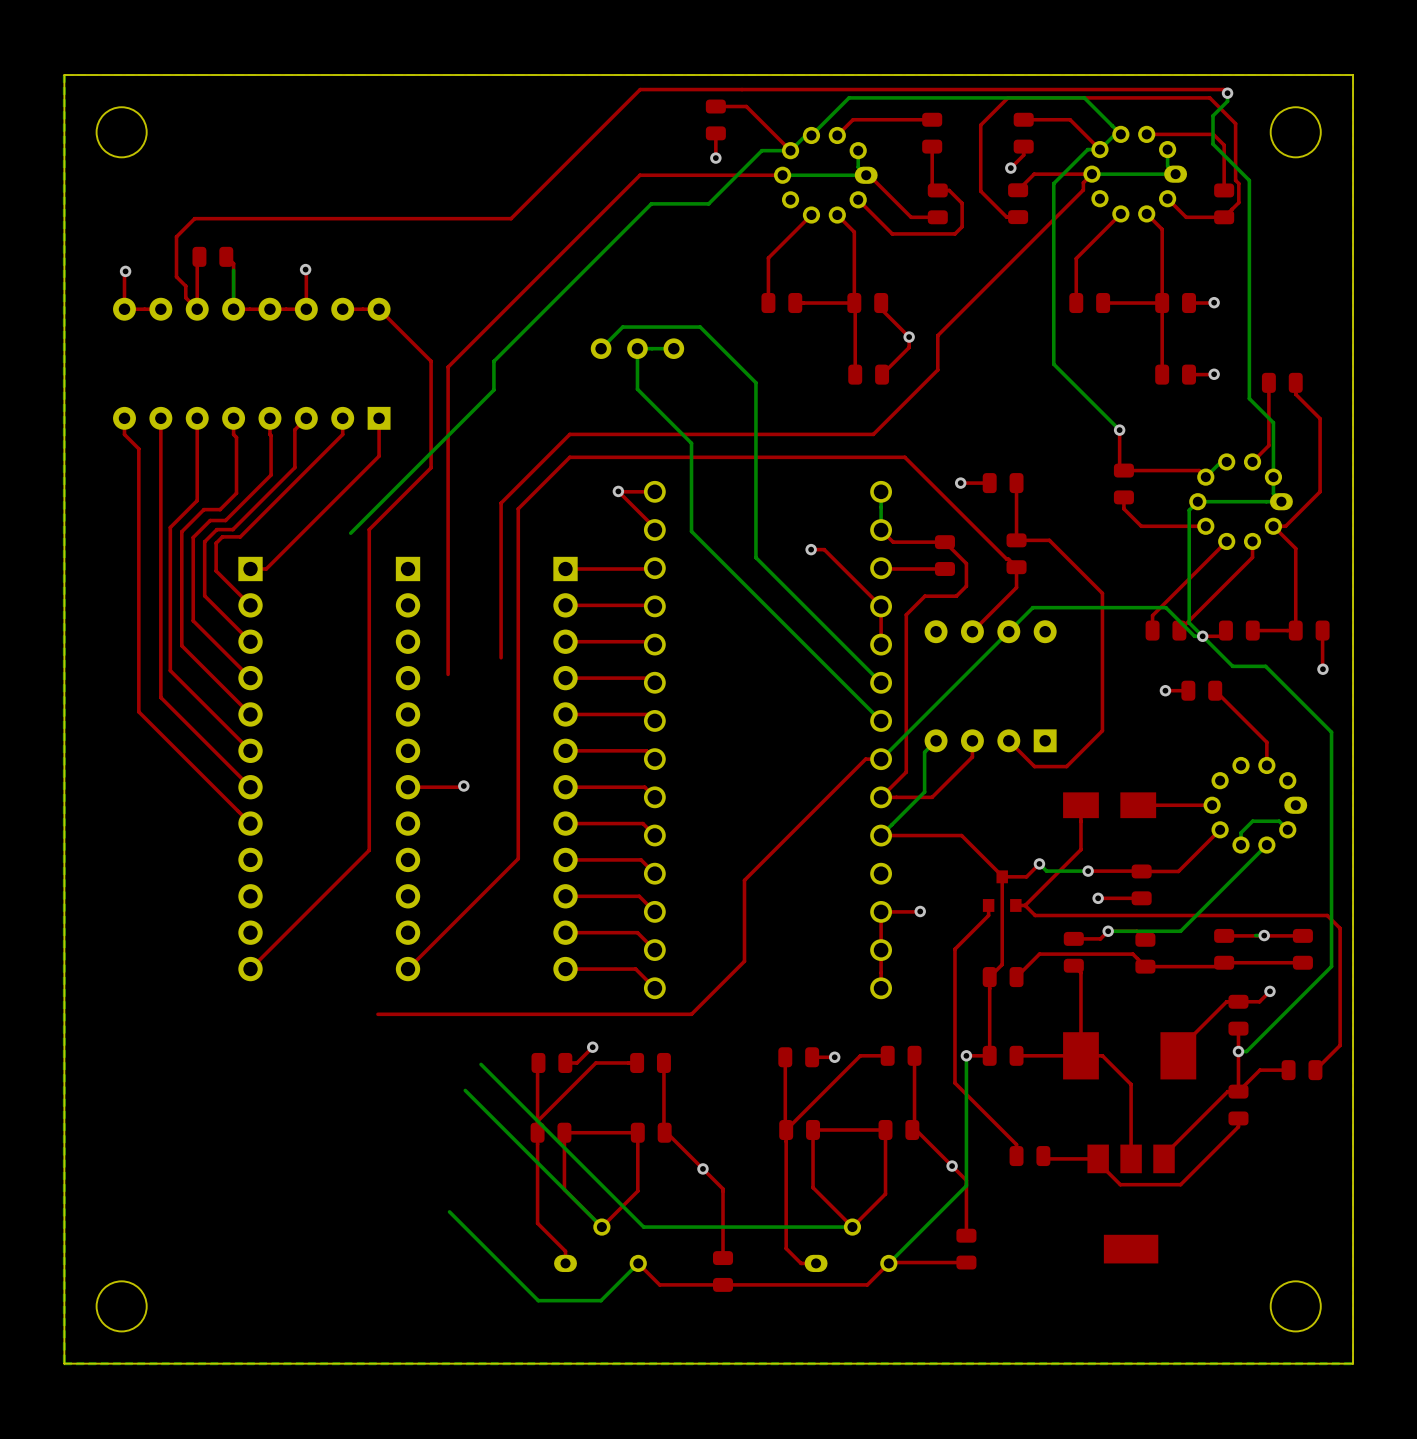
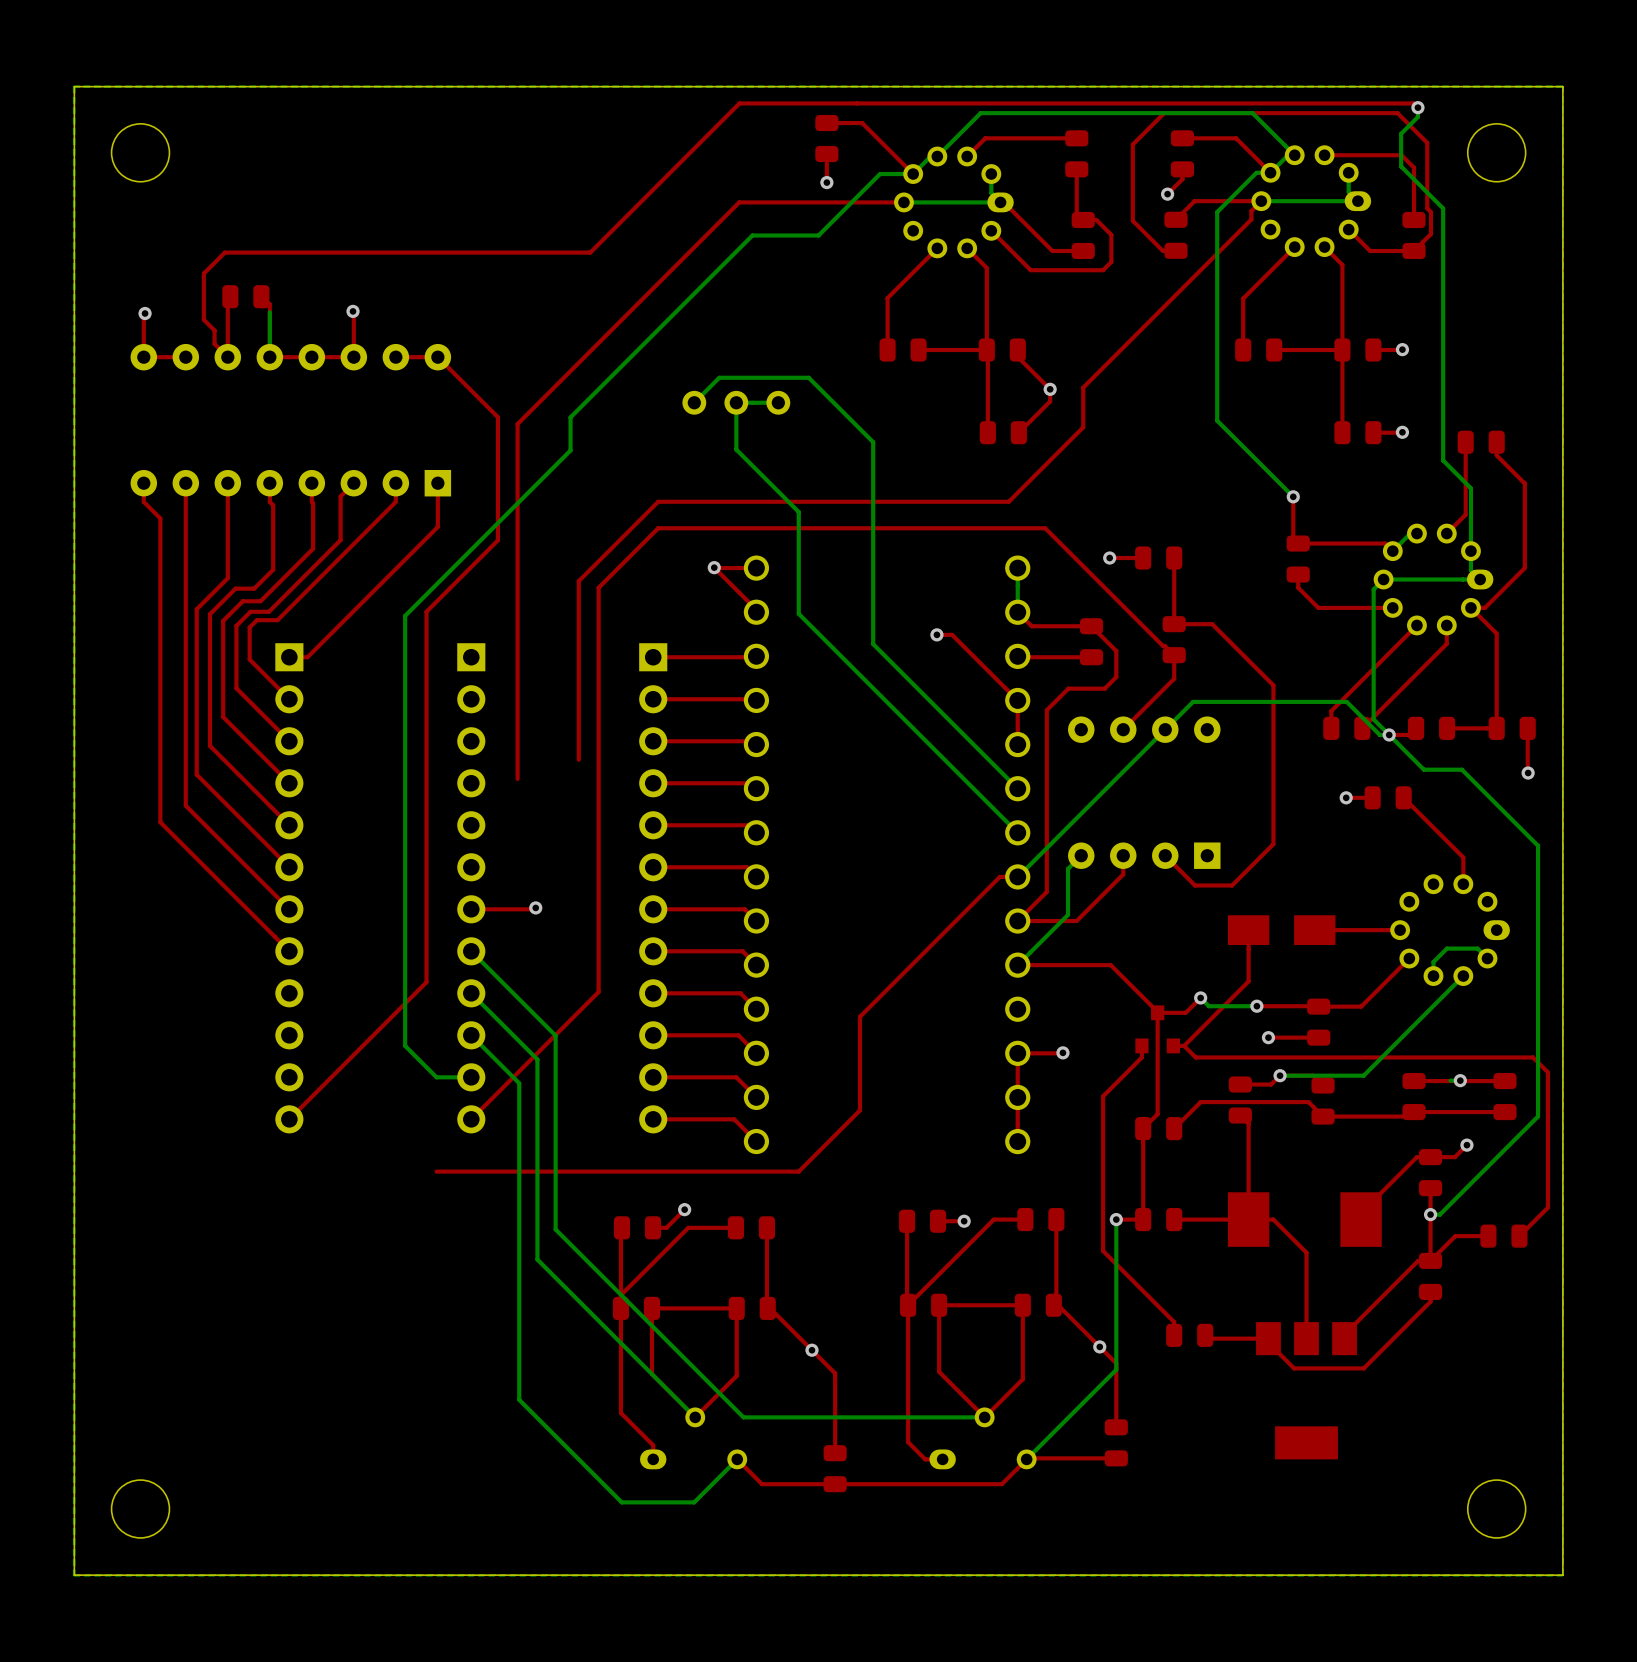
bottom track: none -> (405, 615) (405, 1045) (436, 1077) (471, 1077)
bottom track: none -> (471, 951) (555, 1035) (555, 1229)
bottom track: none -> (471, 993) (537, 1059) (537, 1259)
bottom track: none -> (471, 1035) (519, 1083) (519, 1399)

